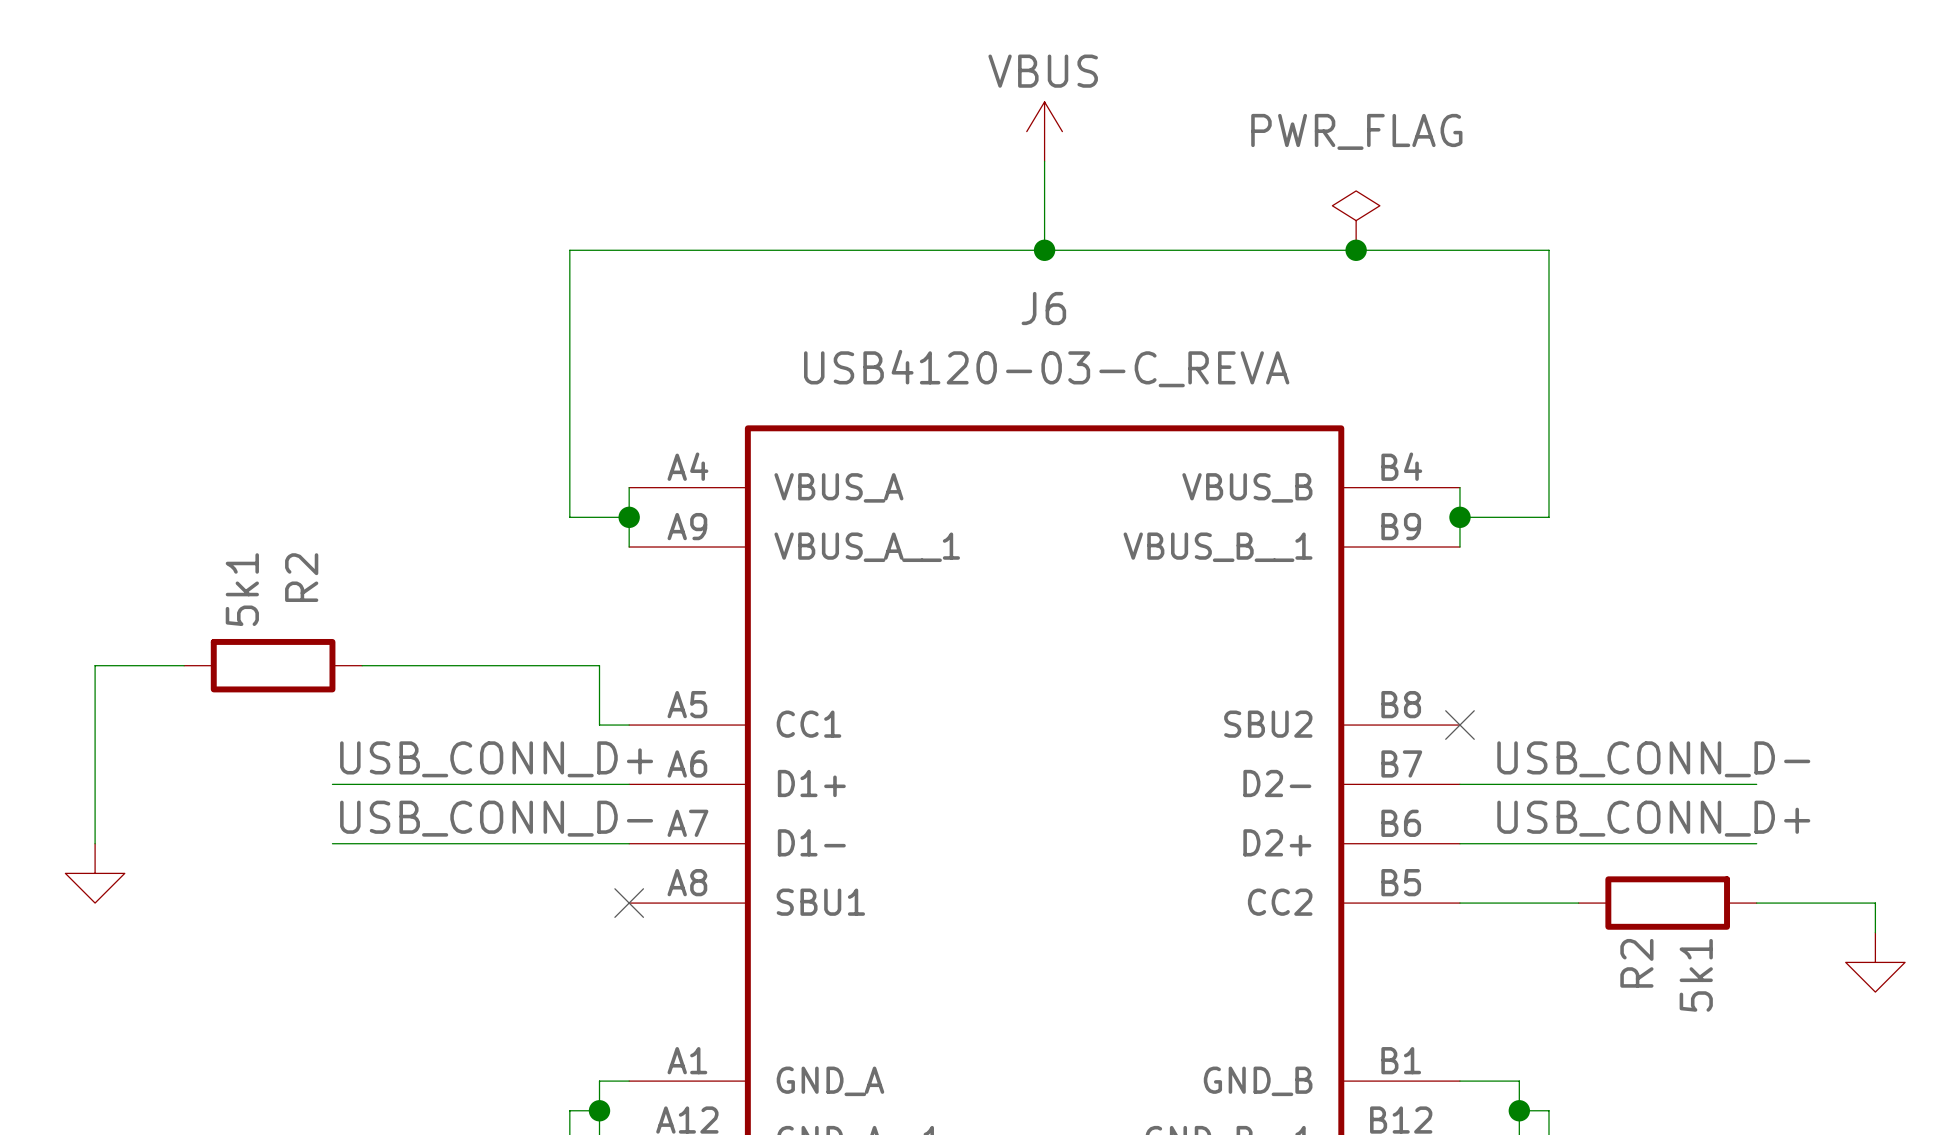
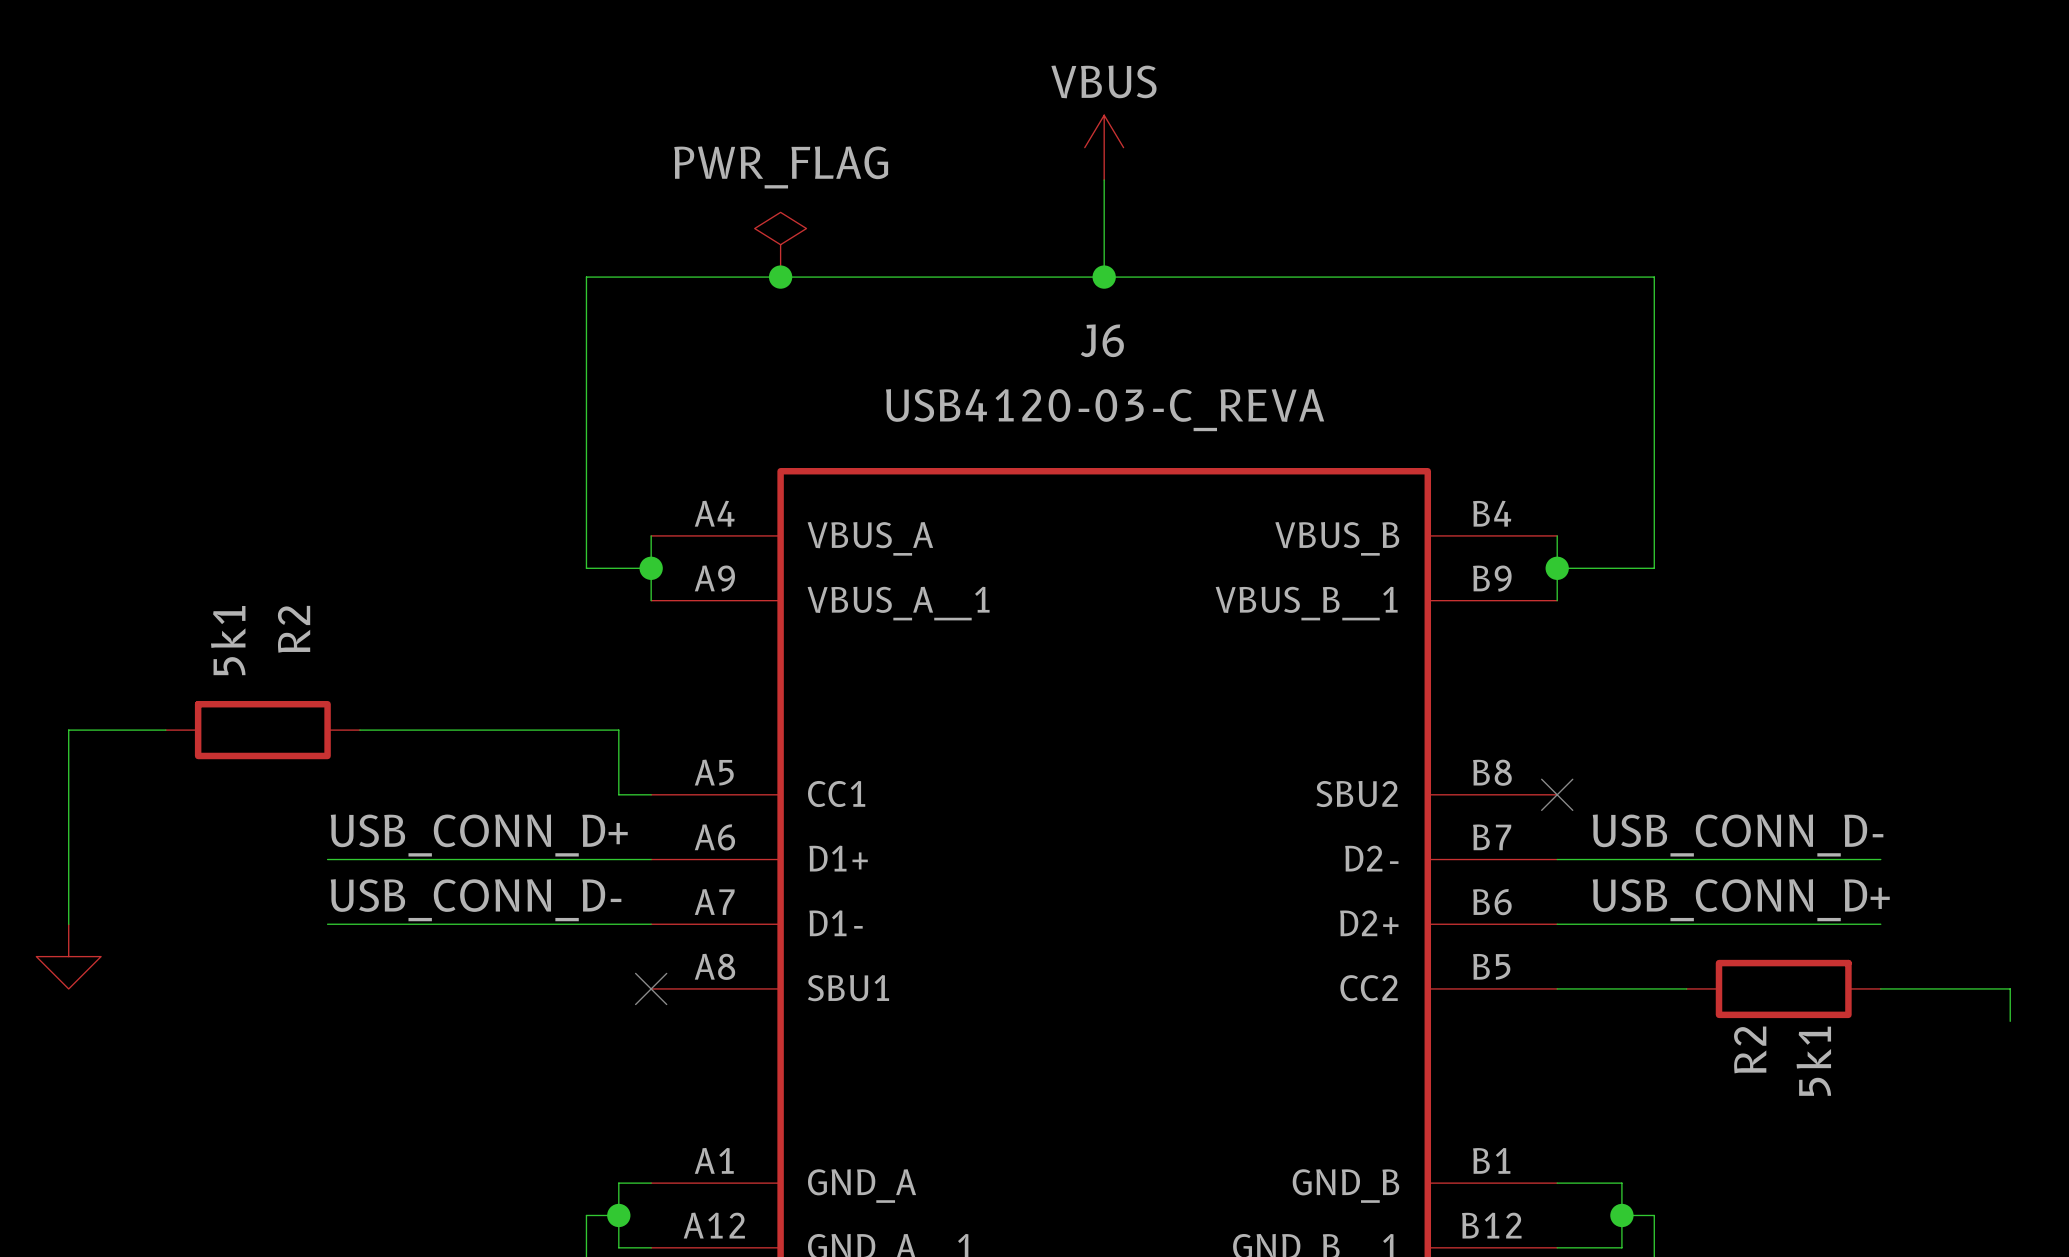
power symbol: none -> PWR_FLAG (780, 244)
power symbol: PWR_FLAG (1356, 220) -> none
junction: none -> (780, 277)
junction: (1356, 250) -> none
power symbol: (1875, 962) -> none

